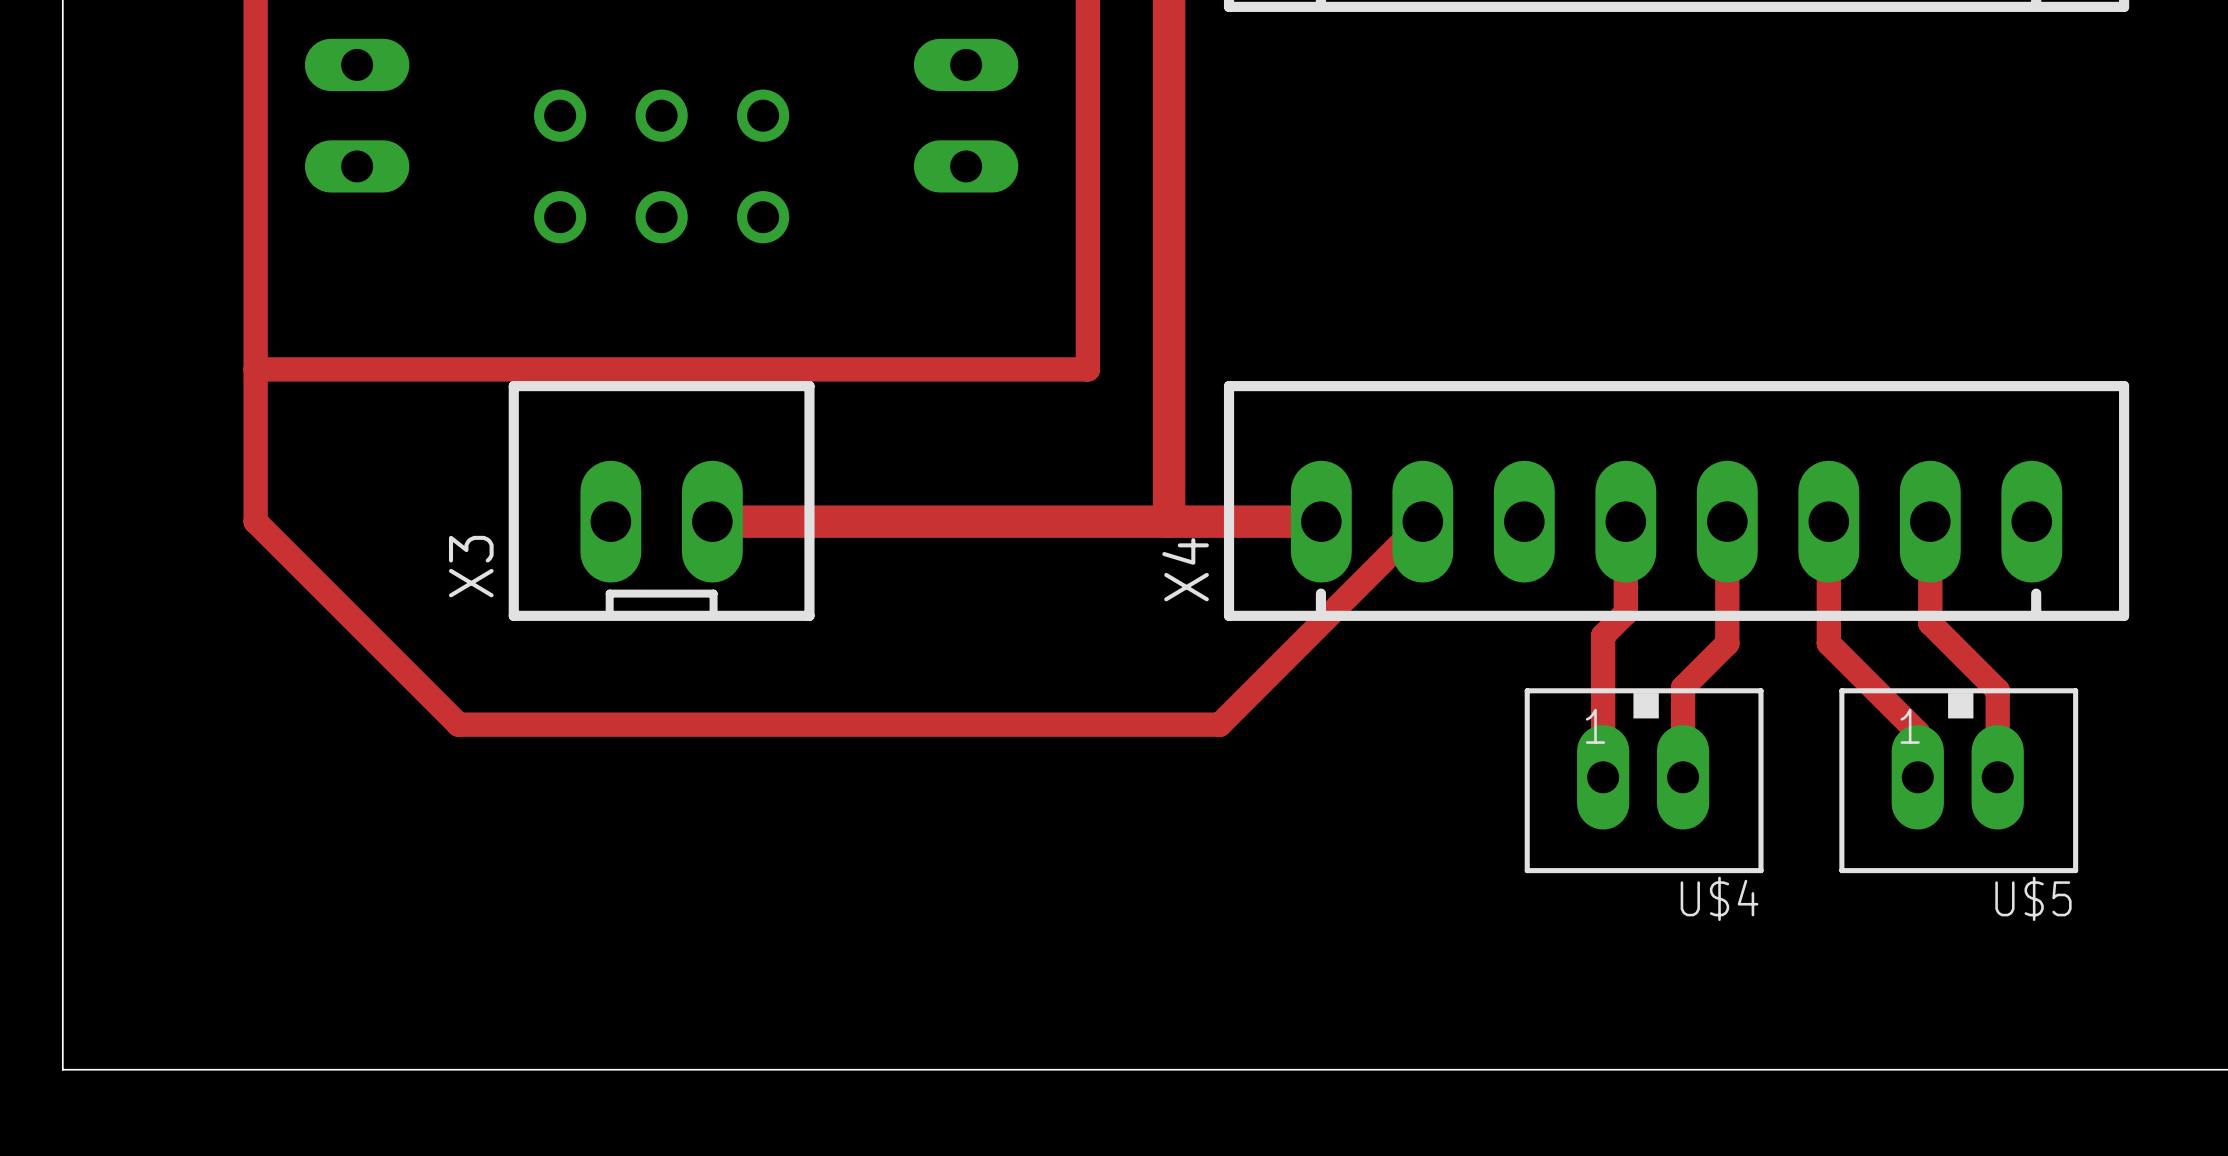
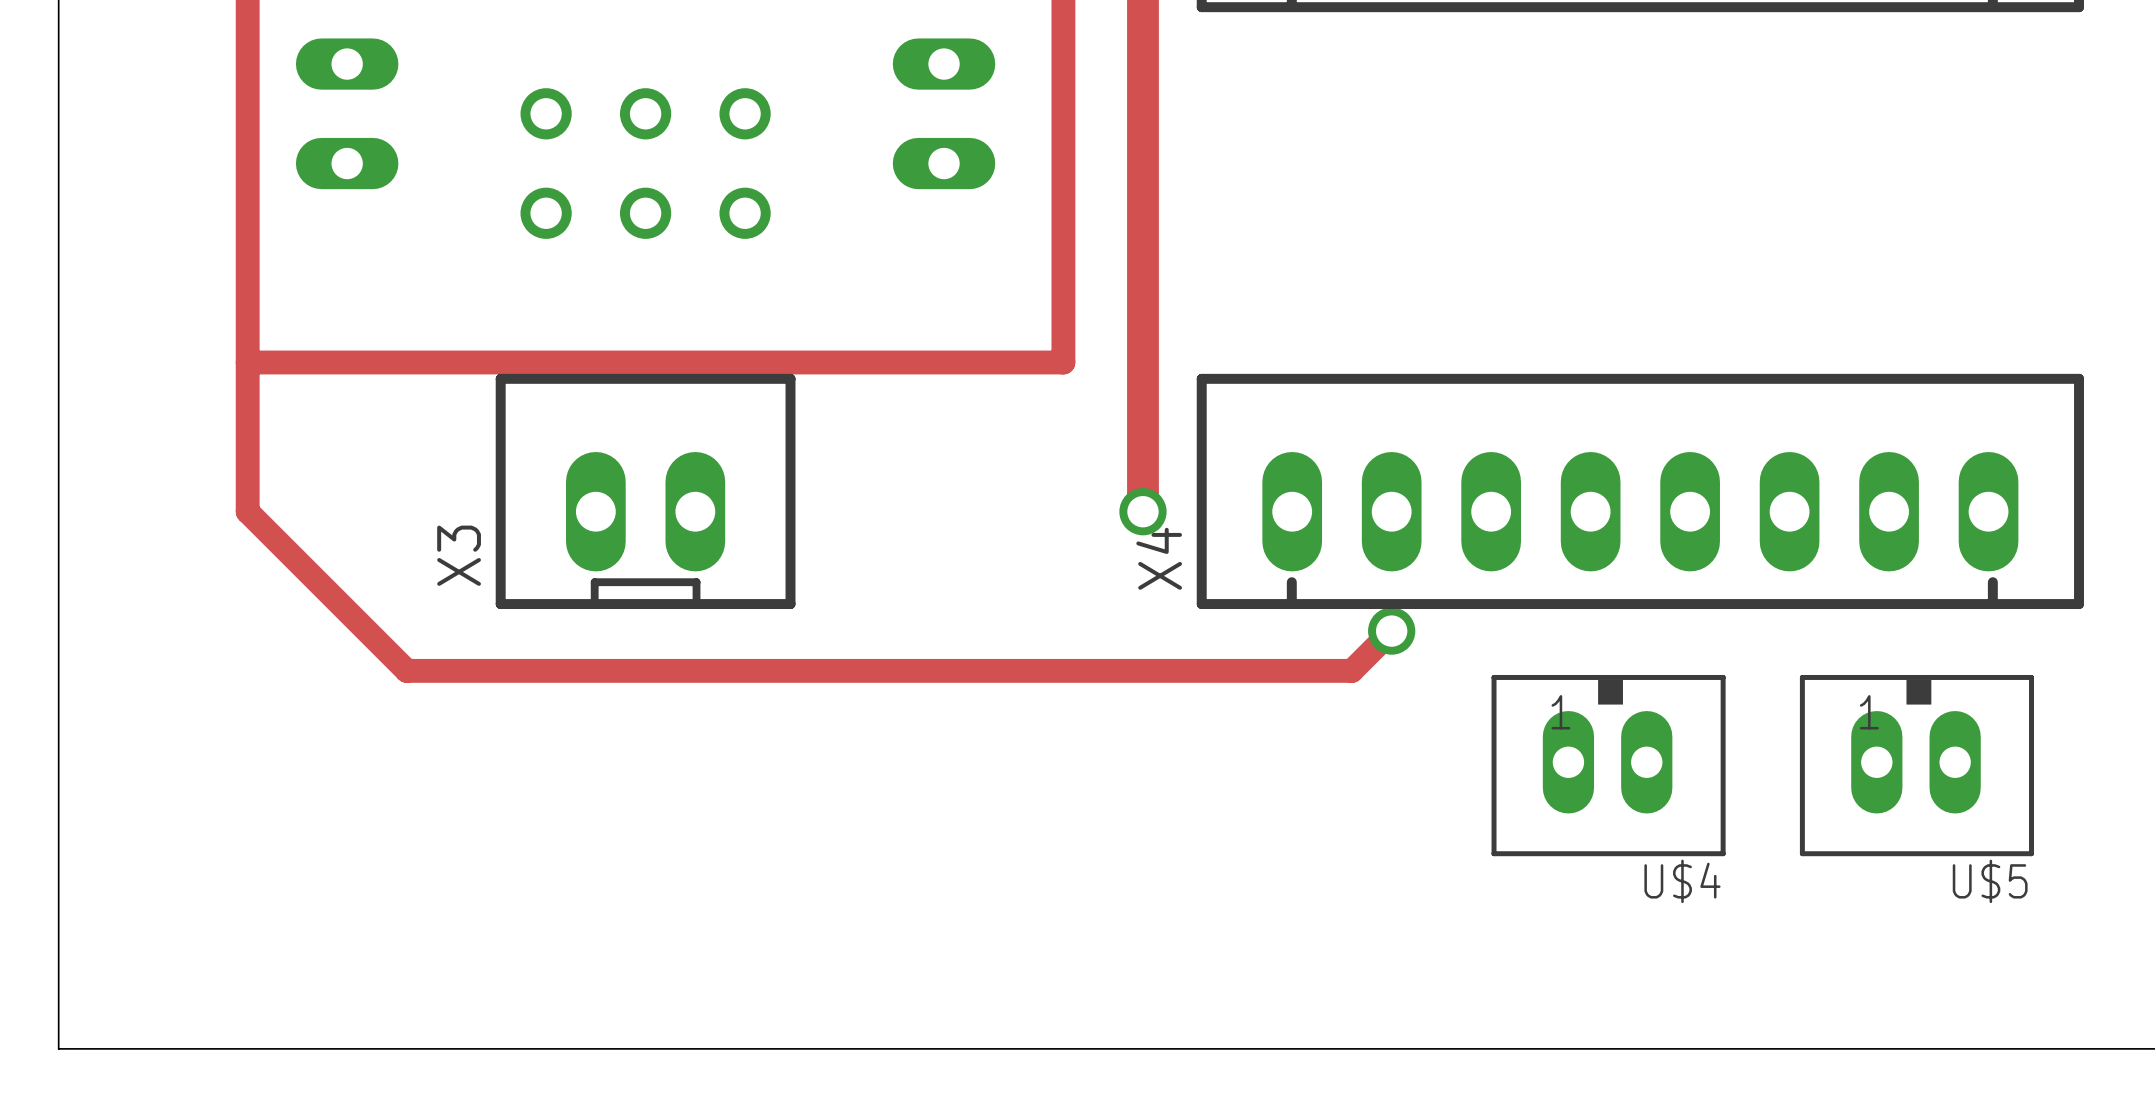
track: (712, 521) (1321, 521) (712, 521) -> none
via: none -> (1142, 511)
track: (1422, 521) (1219, 724) (458, 724) (418, 684) -> (1391, 631) (1351, 670) (406, 670)
track: (1625, 521) (1625, 613) (1603, 635) (1603, 777) -> none
track: (1727, 521) (1727, 643) (1683, 687) (1683, 777) -> none
track: (1828, 521) (1828, 643) (1917, 732) (1917, 777) -> none
track: (1930, 521) (1930, 623) (1997, 690) (1997, 777) -> none
via: none -> (1391, 631)

